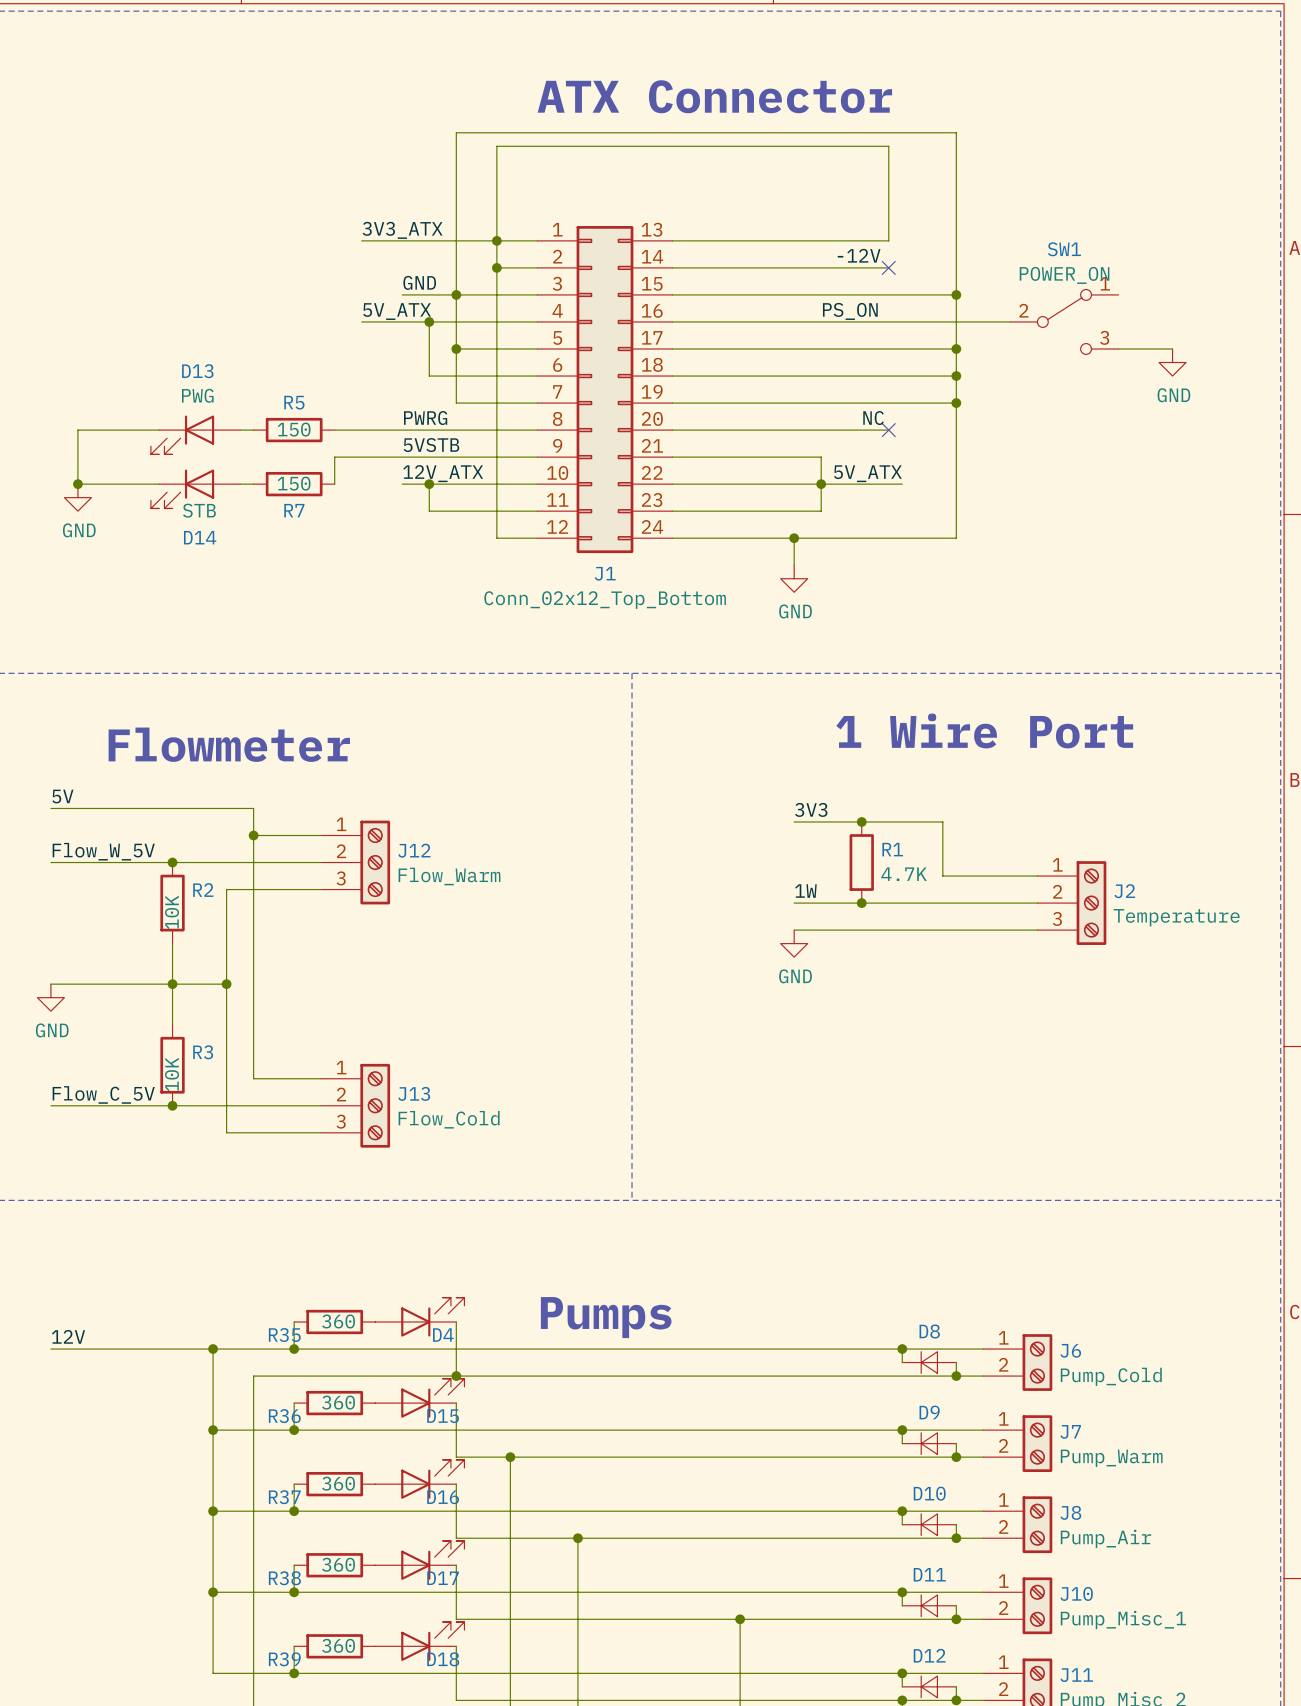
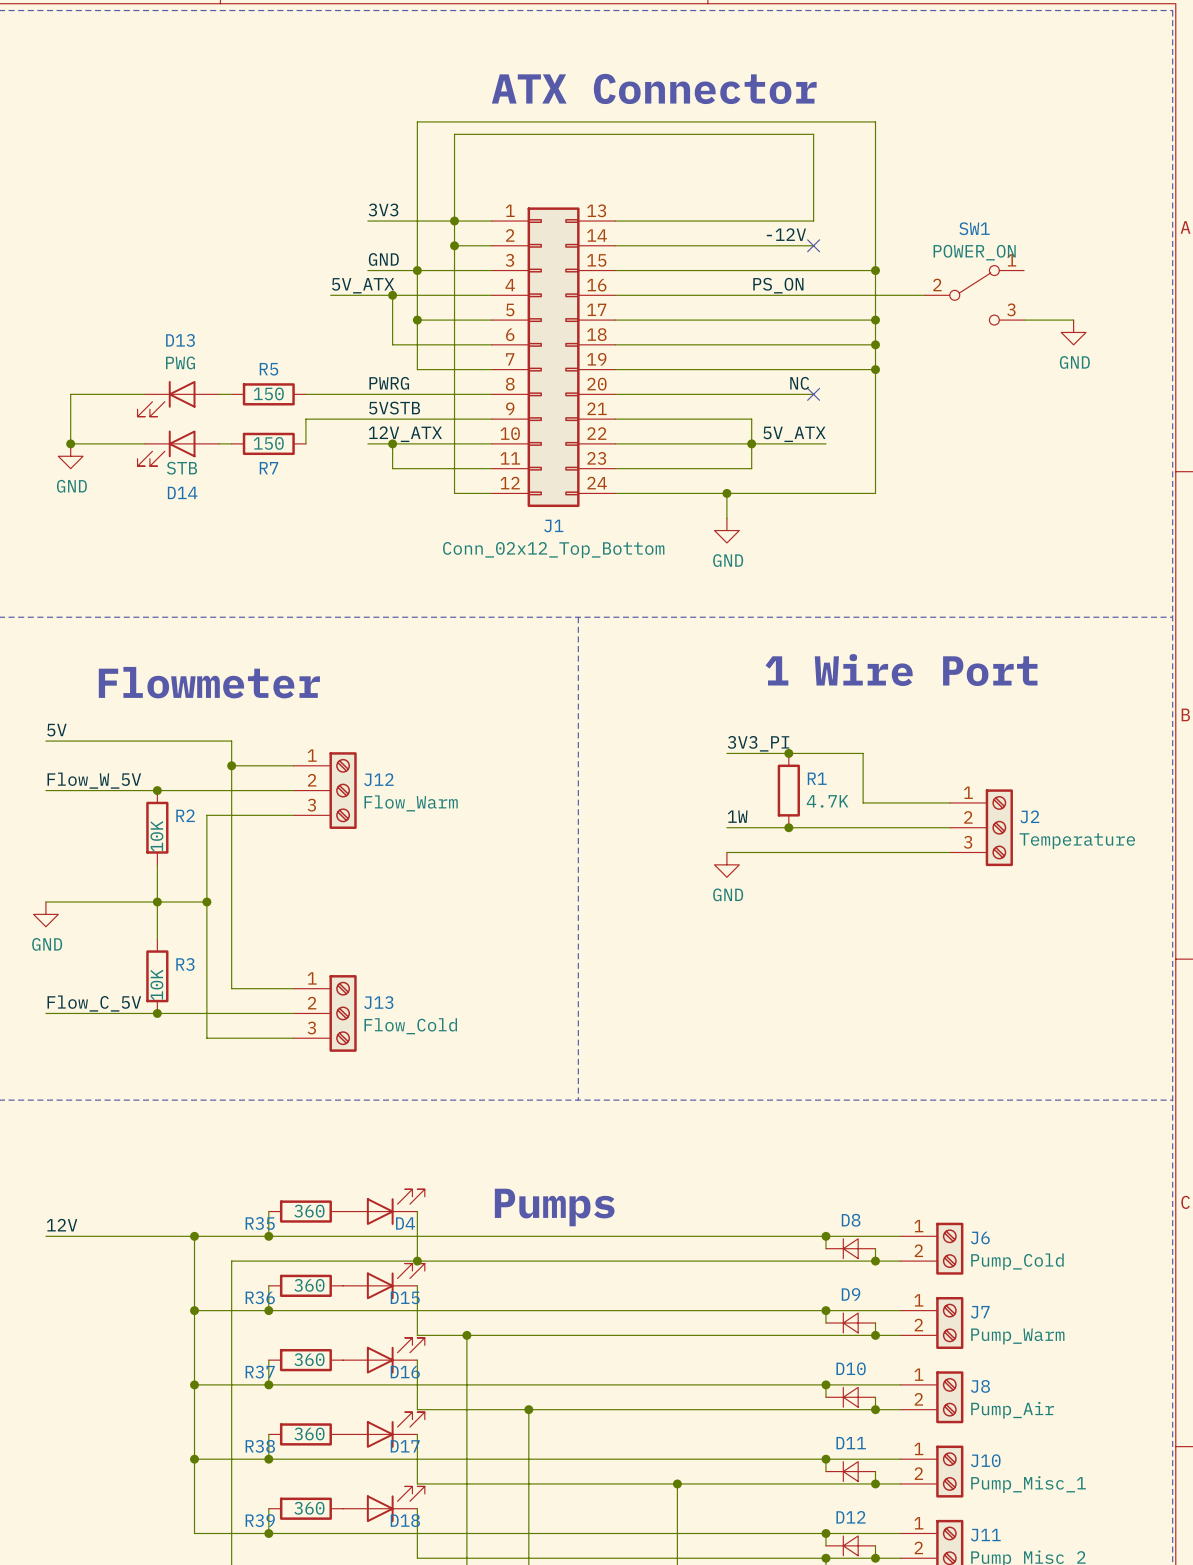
label: none -> 3V3 (383, 209)
label: 3V3_ATX (402, 230) -> none
wire: (361, 240) (402, 240) -> none
label: 3V3 (811, 809) -> 3V3_PI (758, 743)

